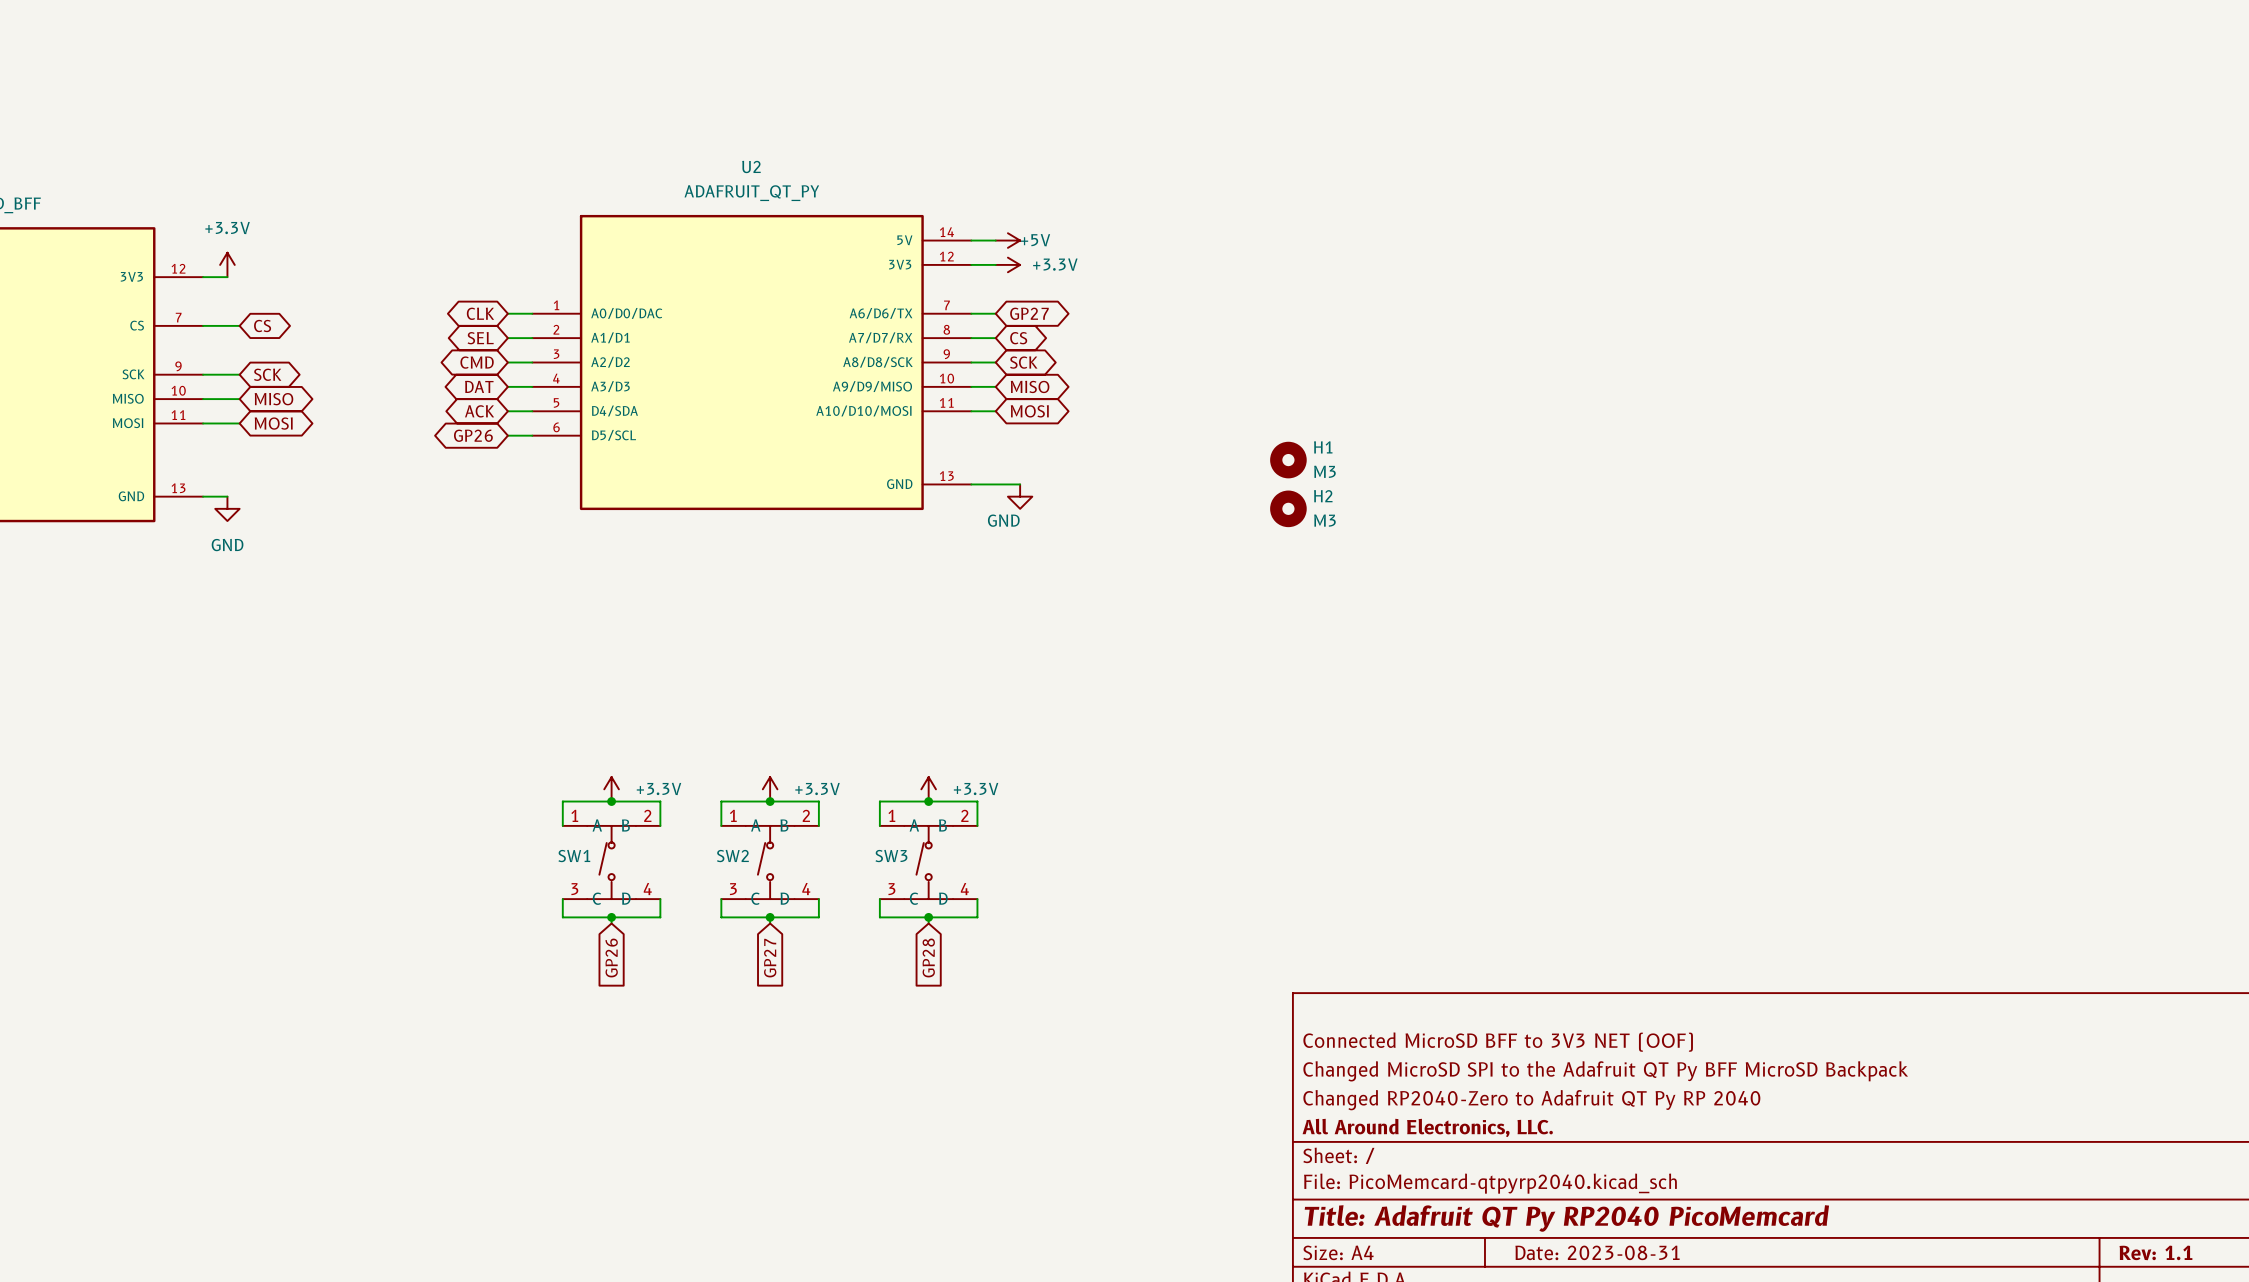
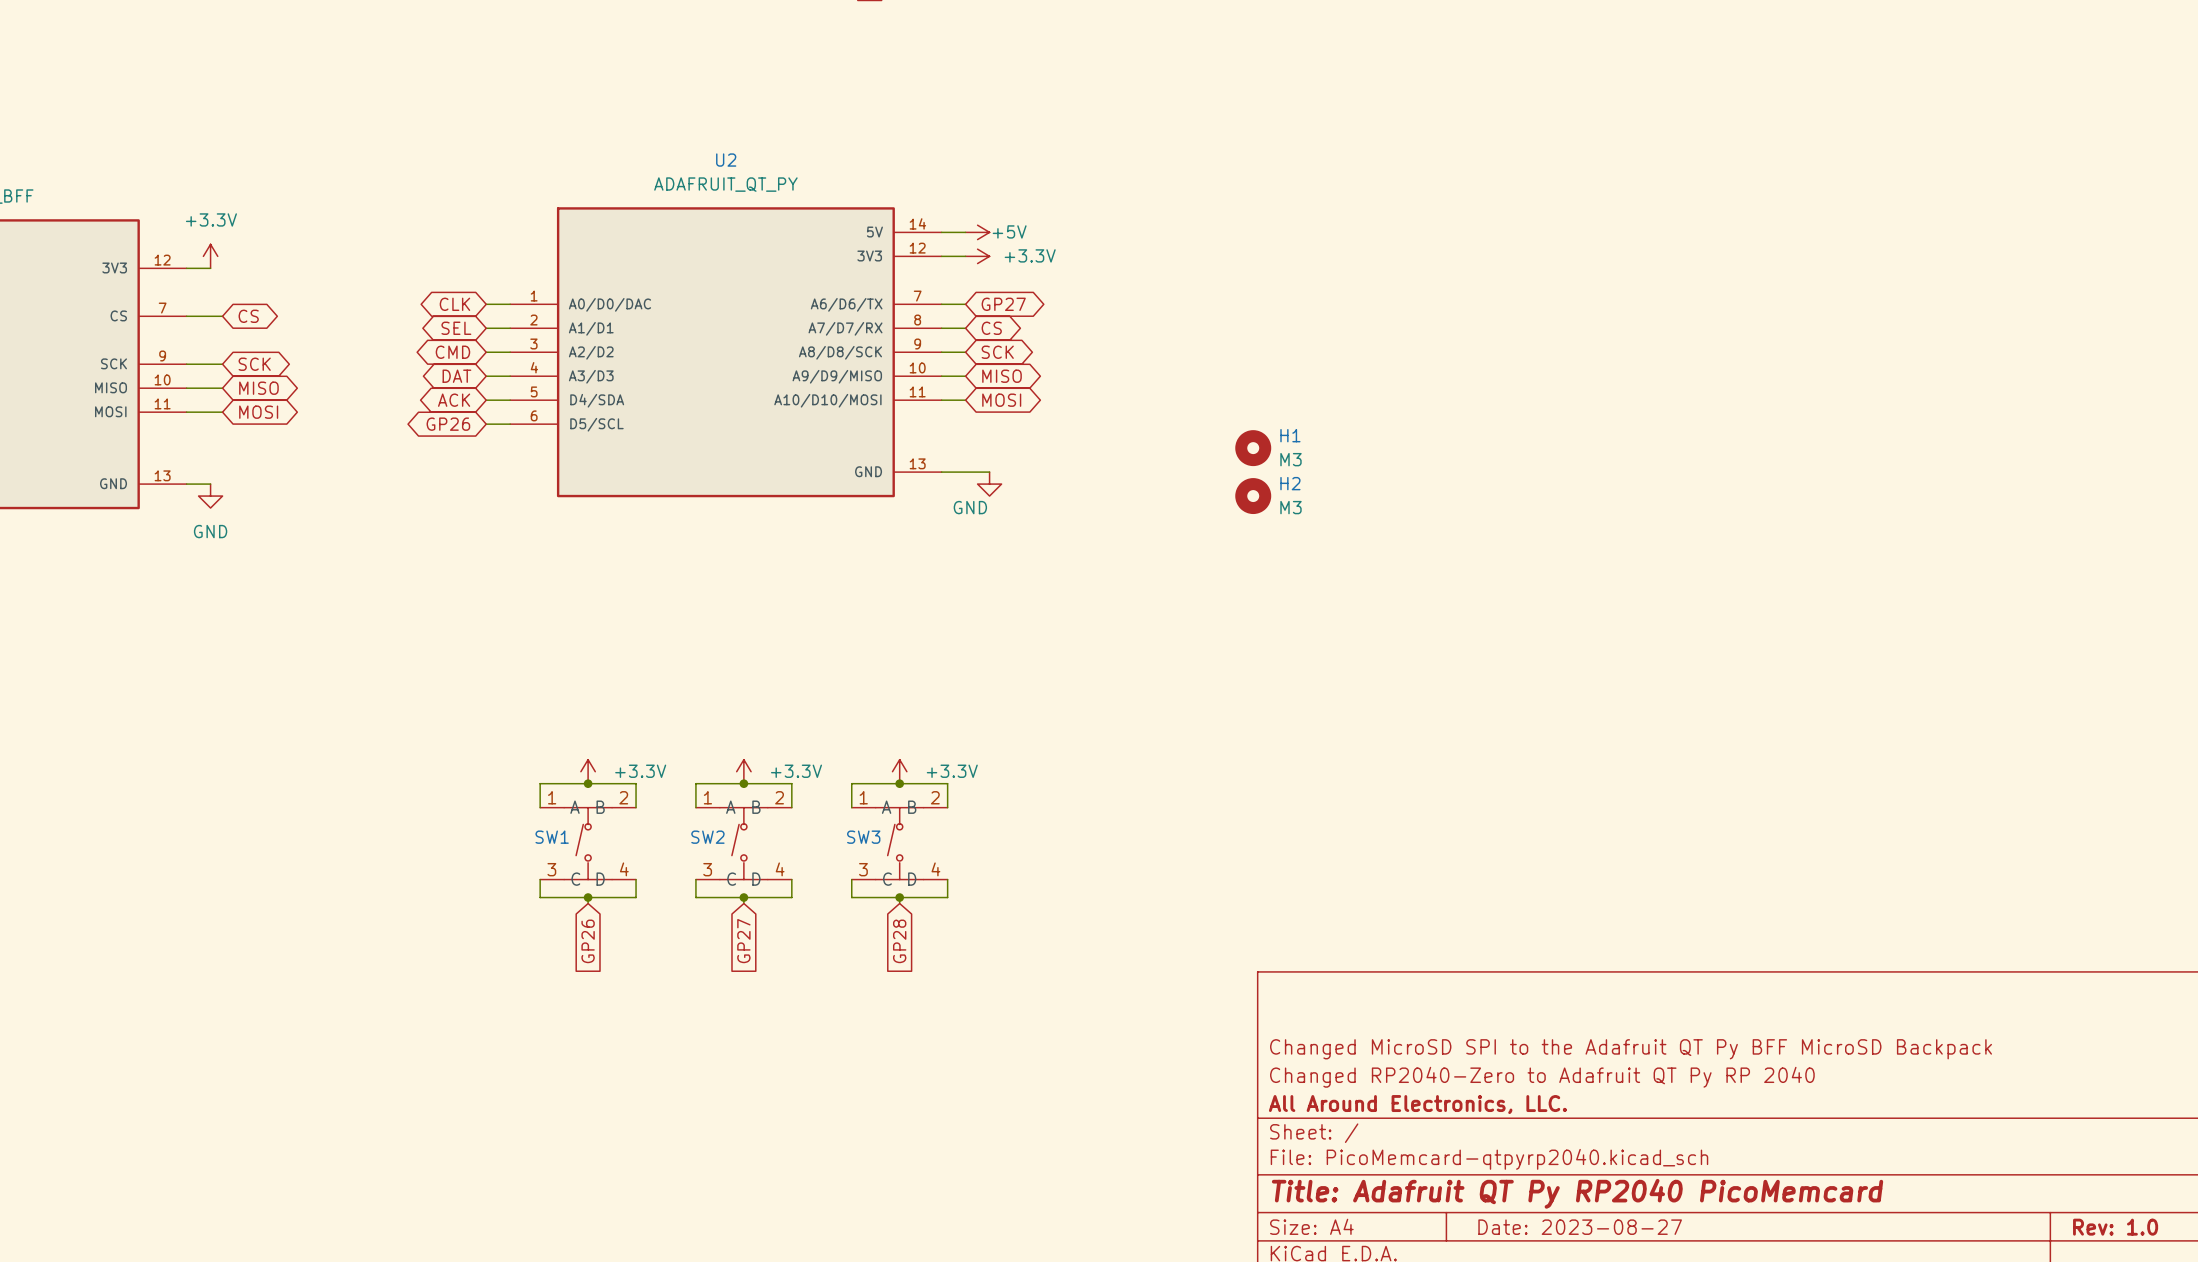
title block: Connected MicroSD BFF to 3V3 NET (OOF) (1498, 1042) -> none
title block: Date: 2023-08-31 (1597, 1252) -> Date: 2023-08-27 (1580, 1227)
title block: Rev: 1.1 (2155, 1252) -> Rev: 1.0 (2115, 1227)

